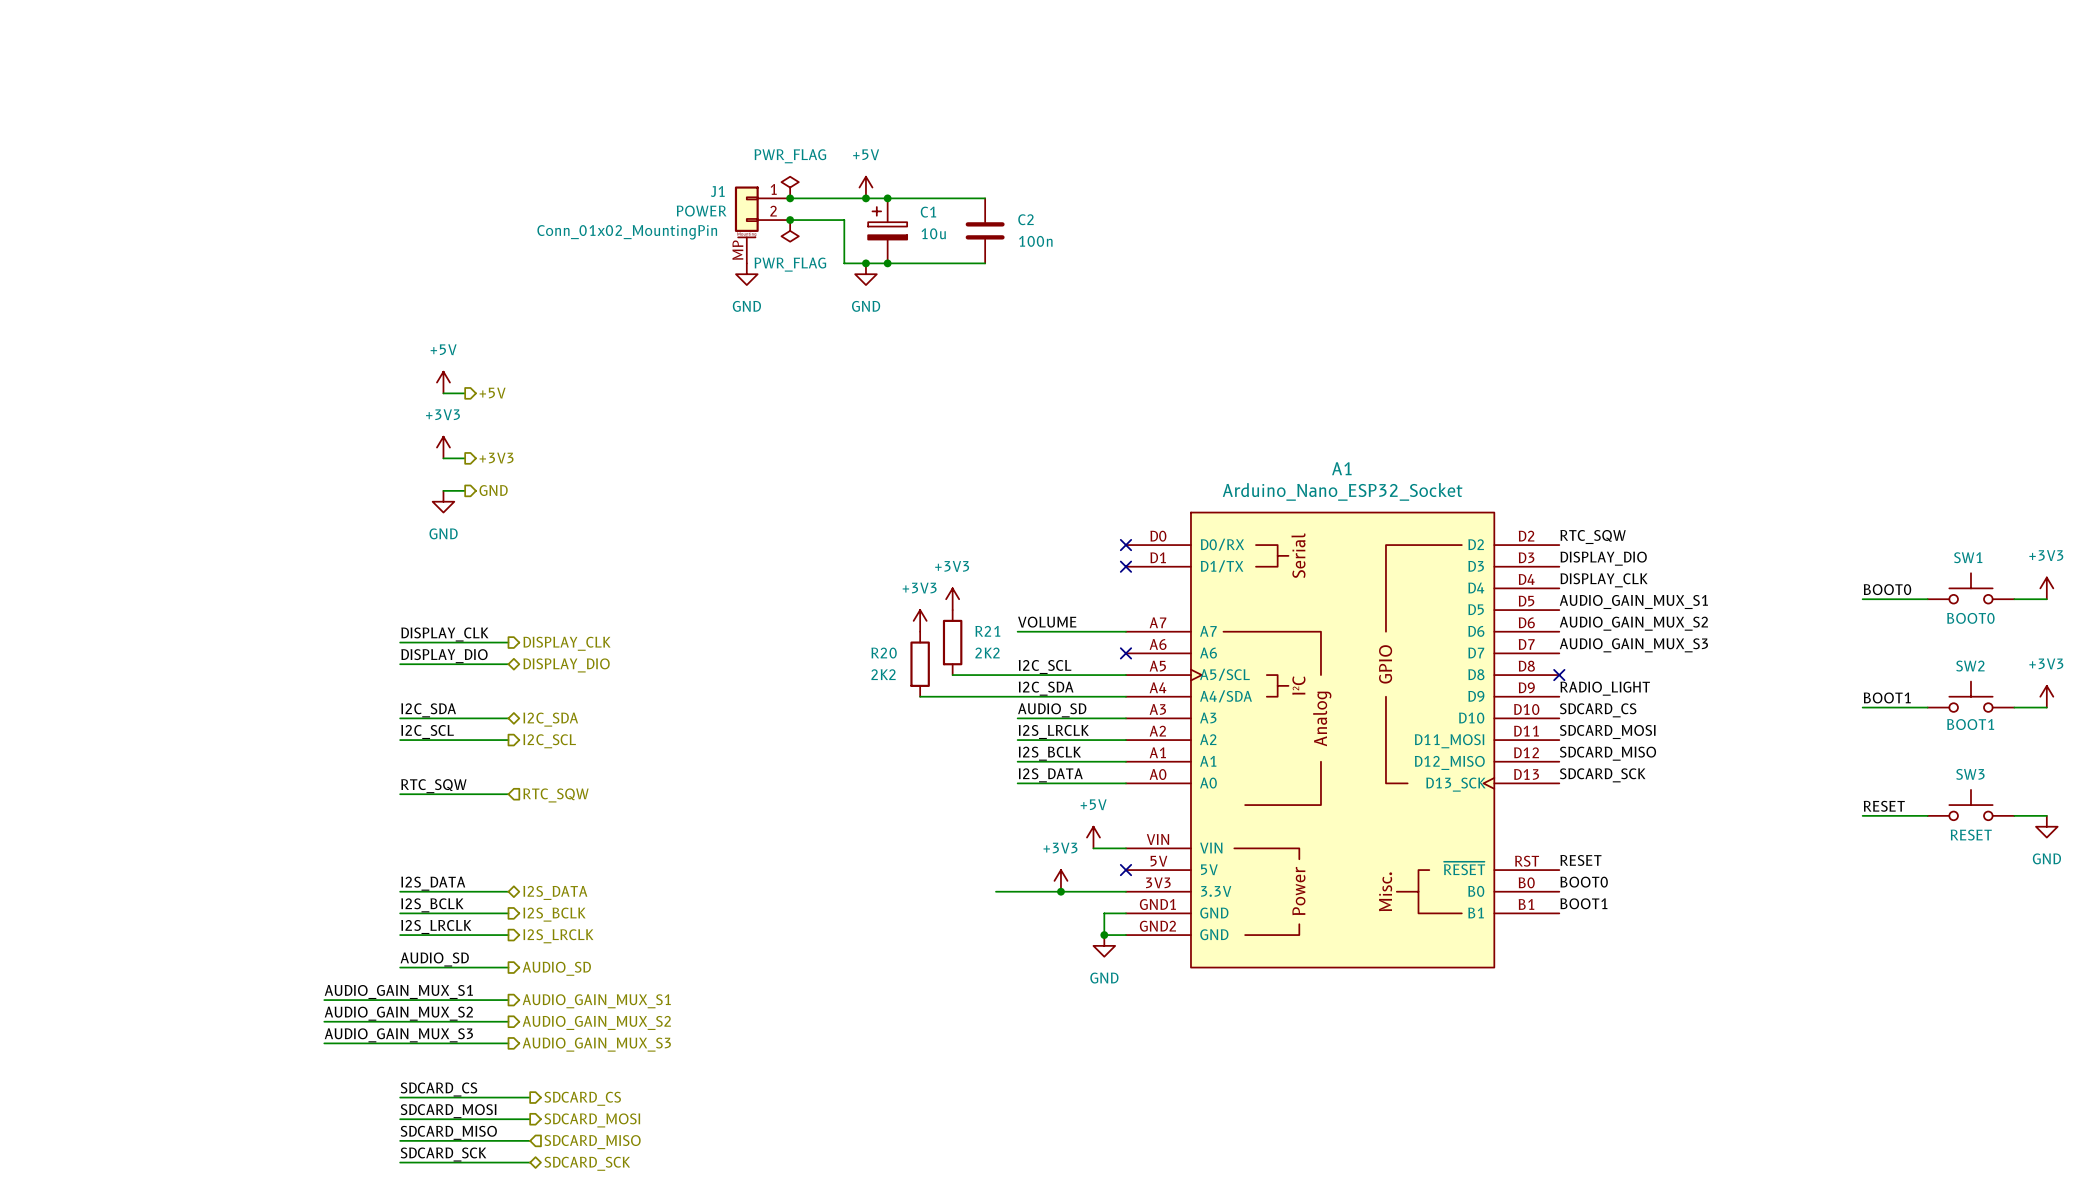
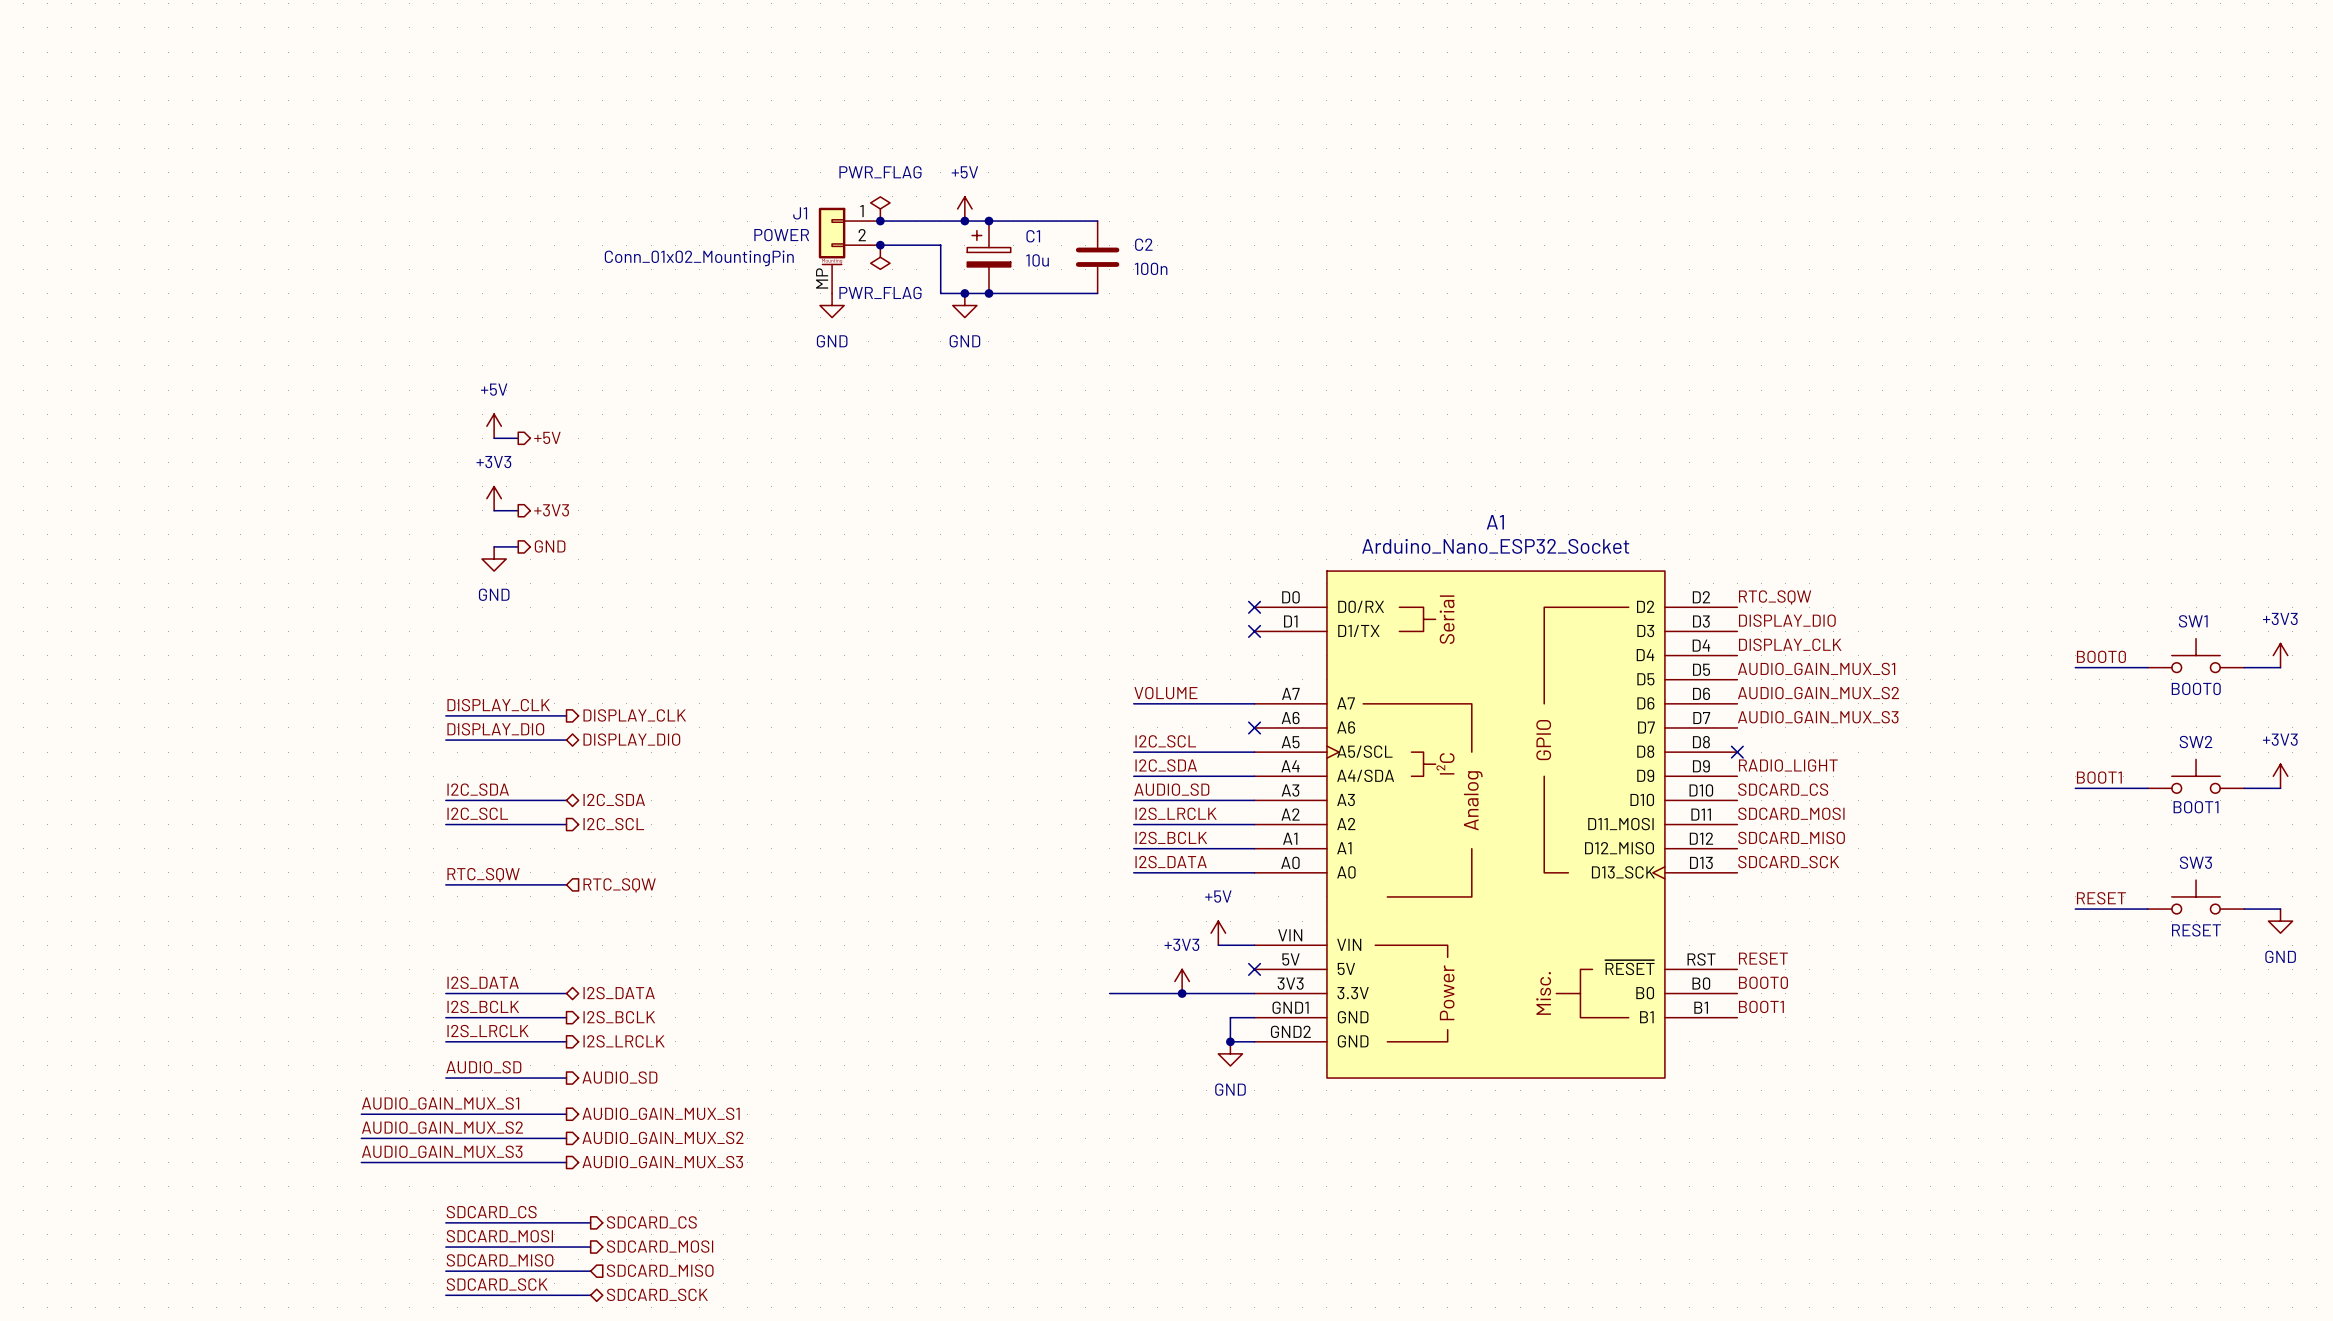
power symbol: +3V3 (952, 599) -> none
power symbol: +3V3 (920, 620) -> none
R21: 2K2 (952, 642) -> none
R20: 2K2 (920, 664) -> none
wire: (952, 675) (1017, 675) -> none
wire: (920, 696) (1017, 696) -> none

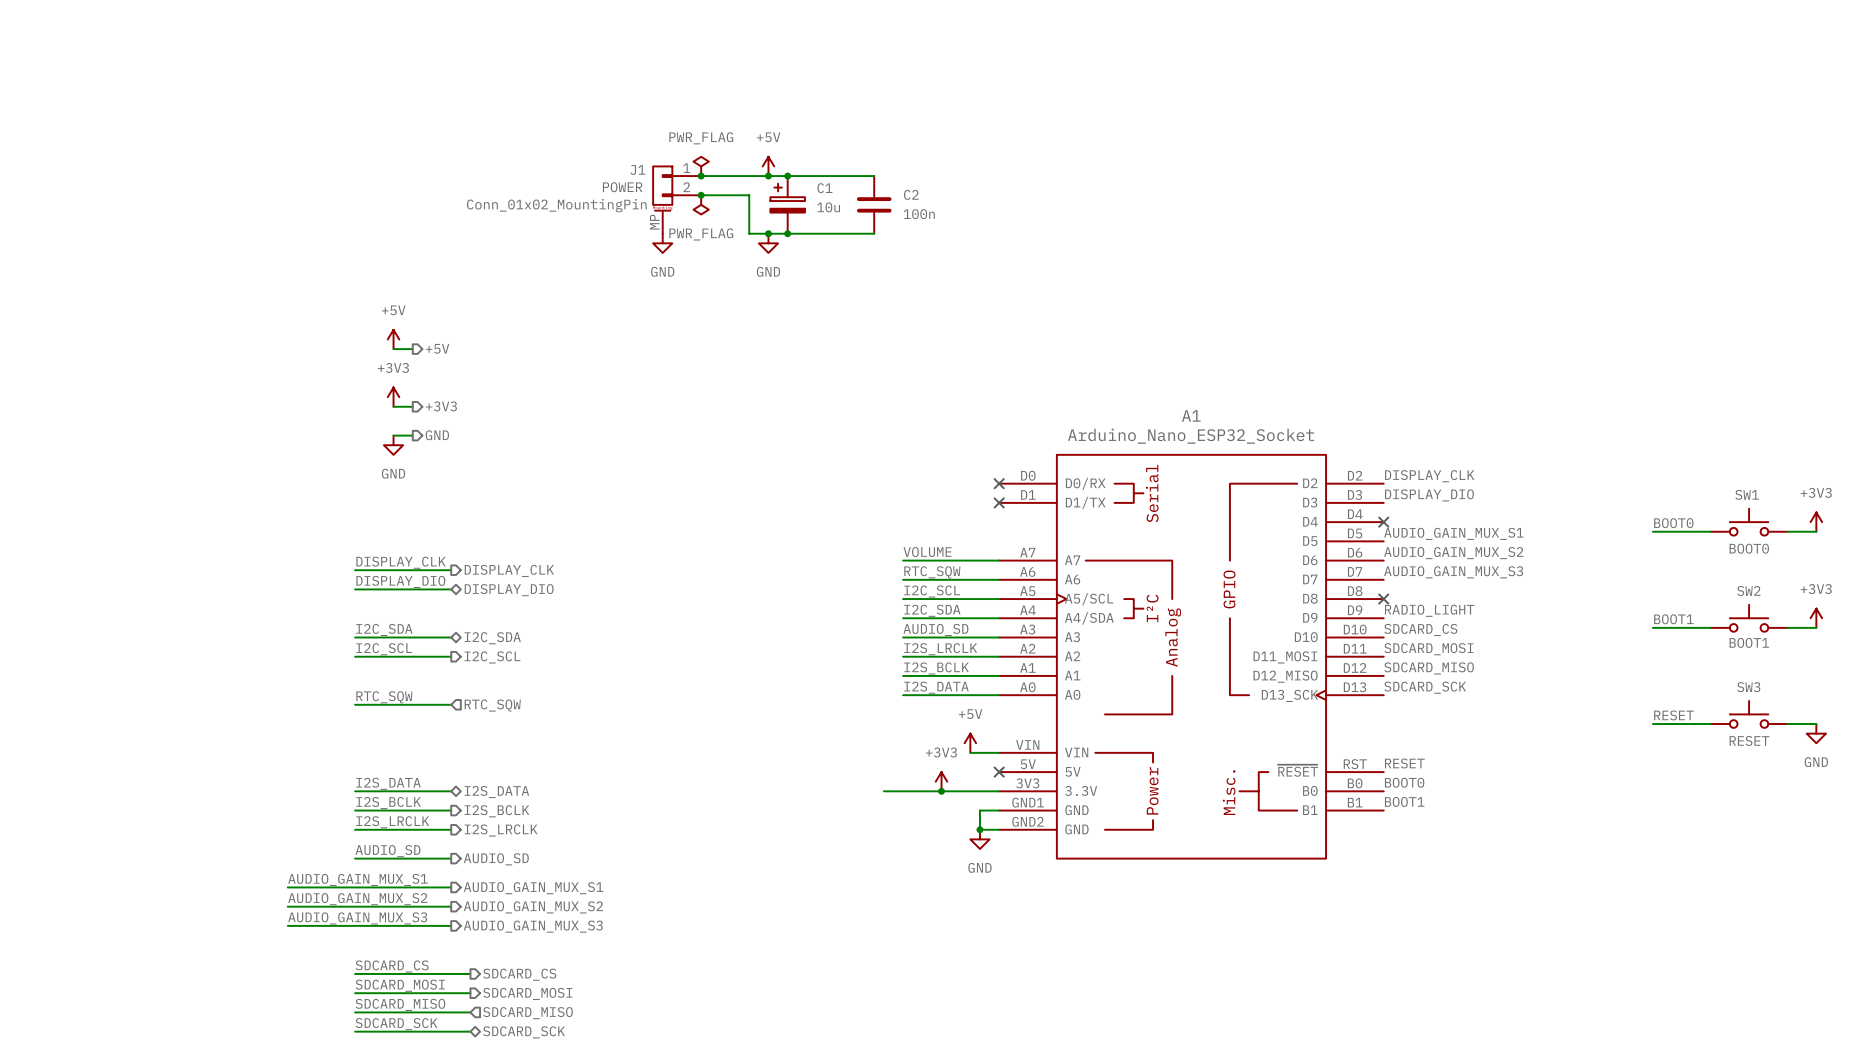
label: RTC_SQW (1775, 597) -> DISPLAY_CLK (1429, 476)
label: DISPLAY_CLK (1790, 644) -> none
no-connect mark: none -> (1383, 522)
label: none -> RTC_SQW (932, 572)
wire: none -> (903, 579) (999, 579)
no-connect mark: (1254, 727) -> none

